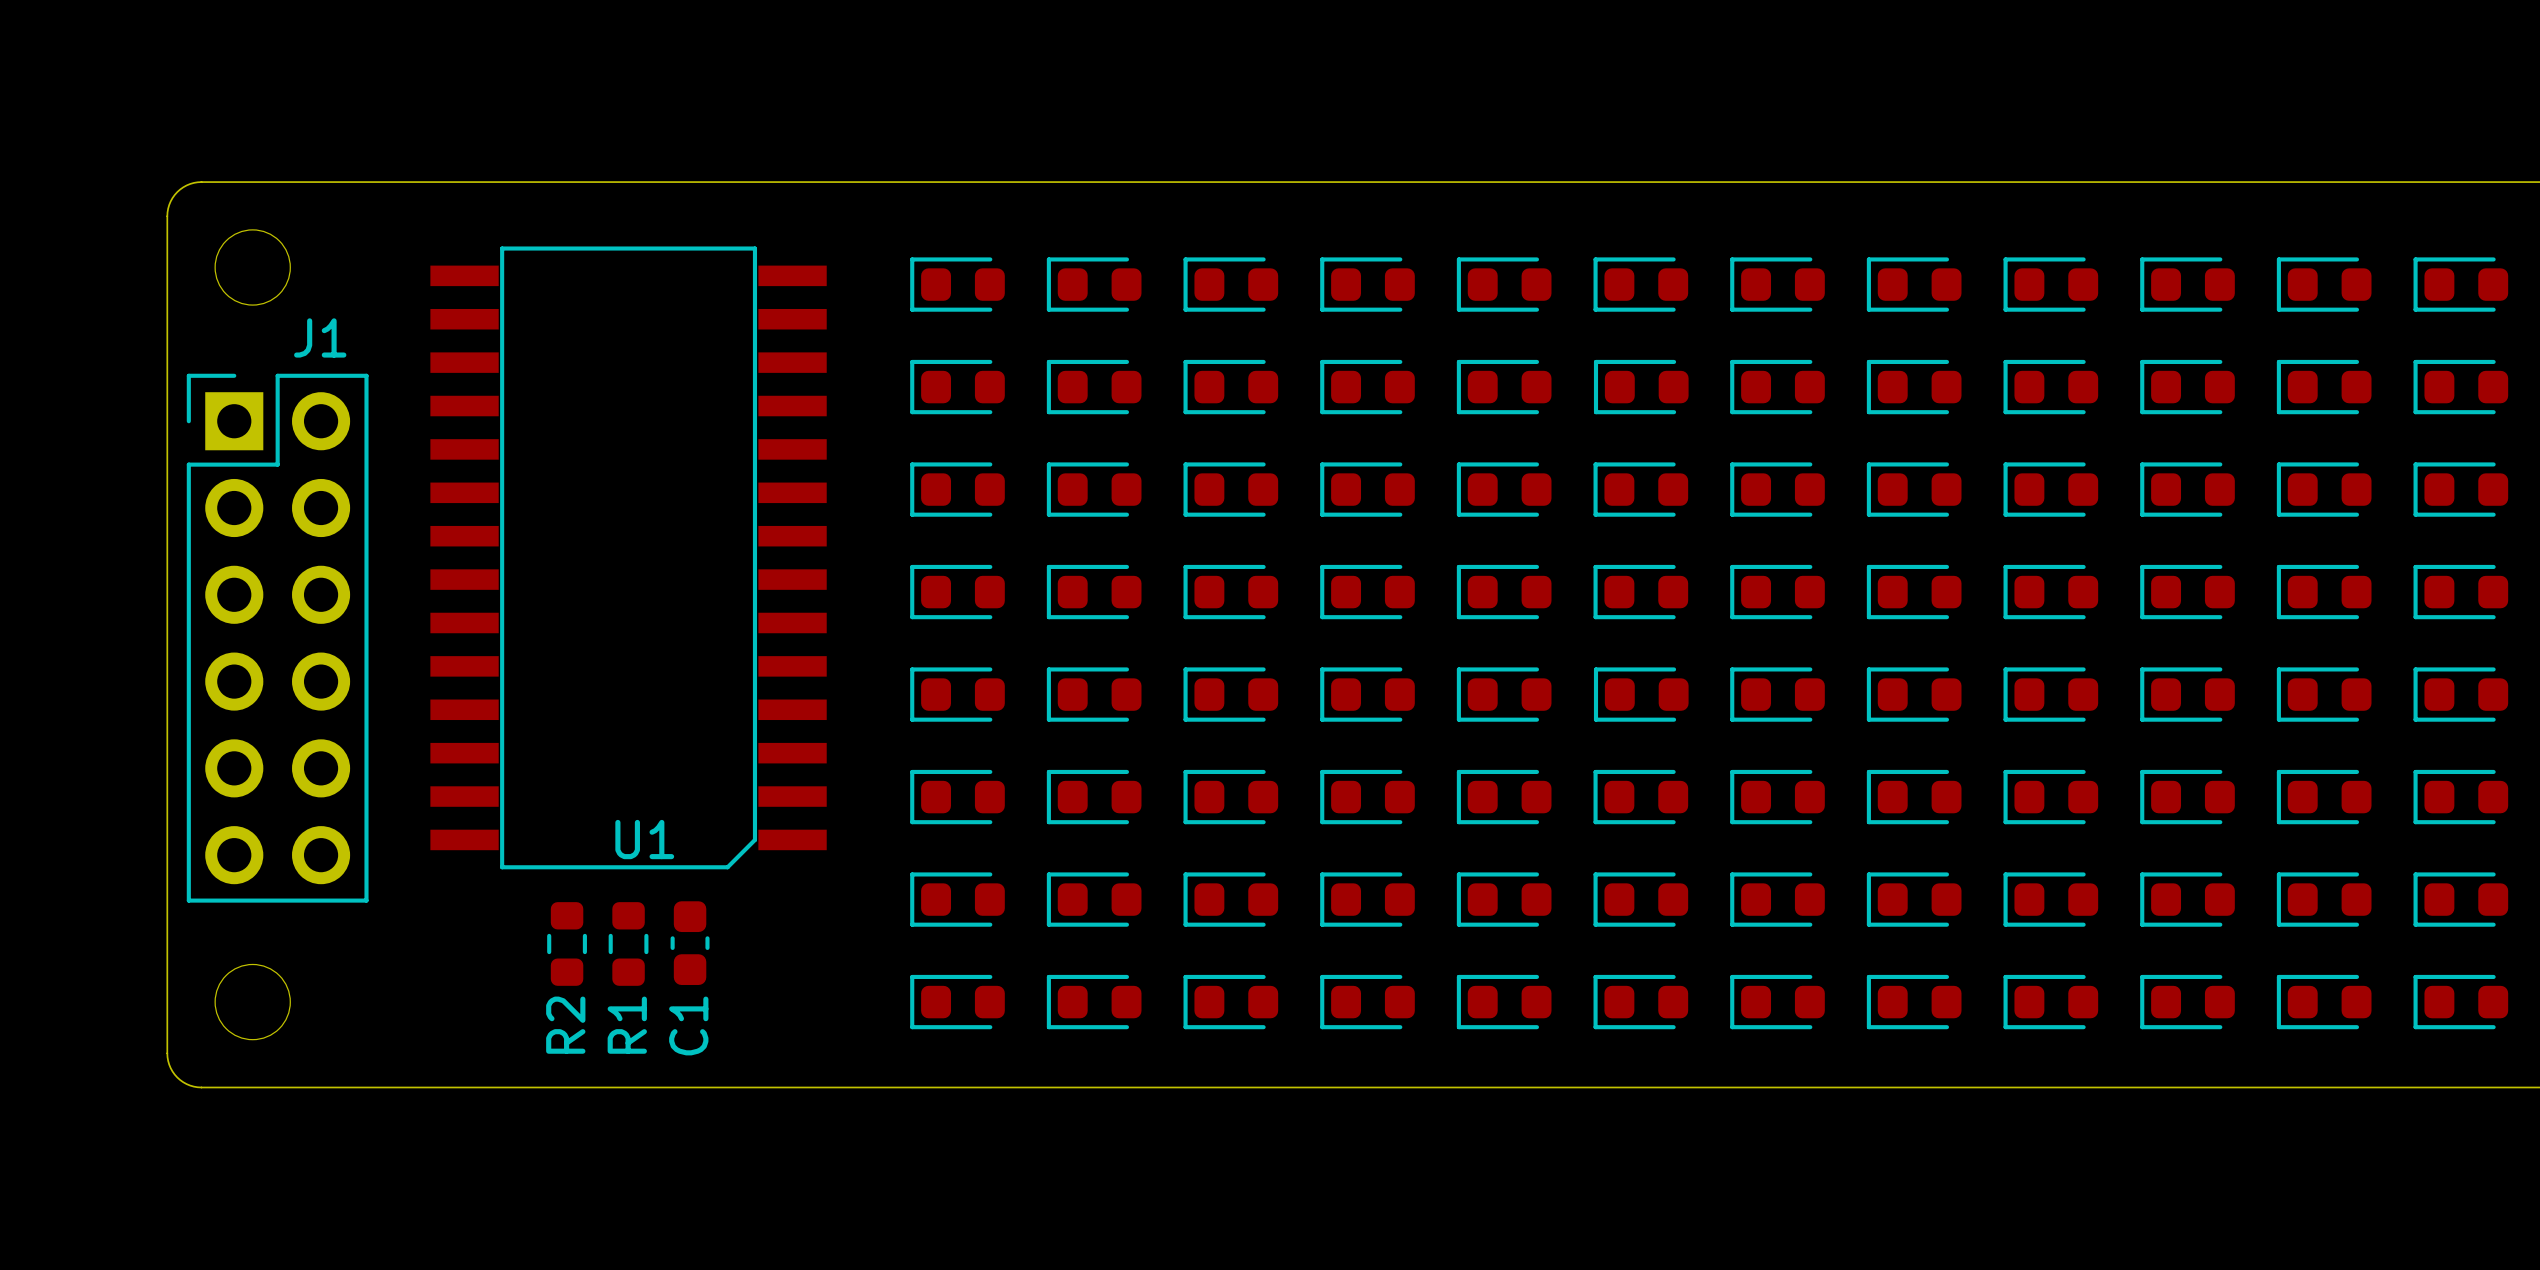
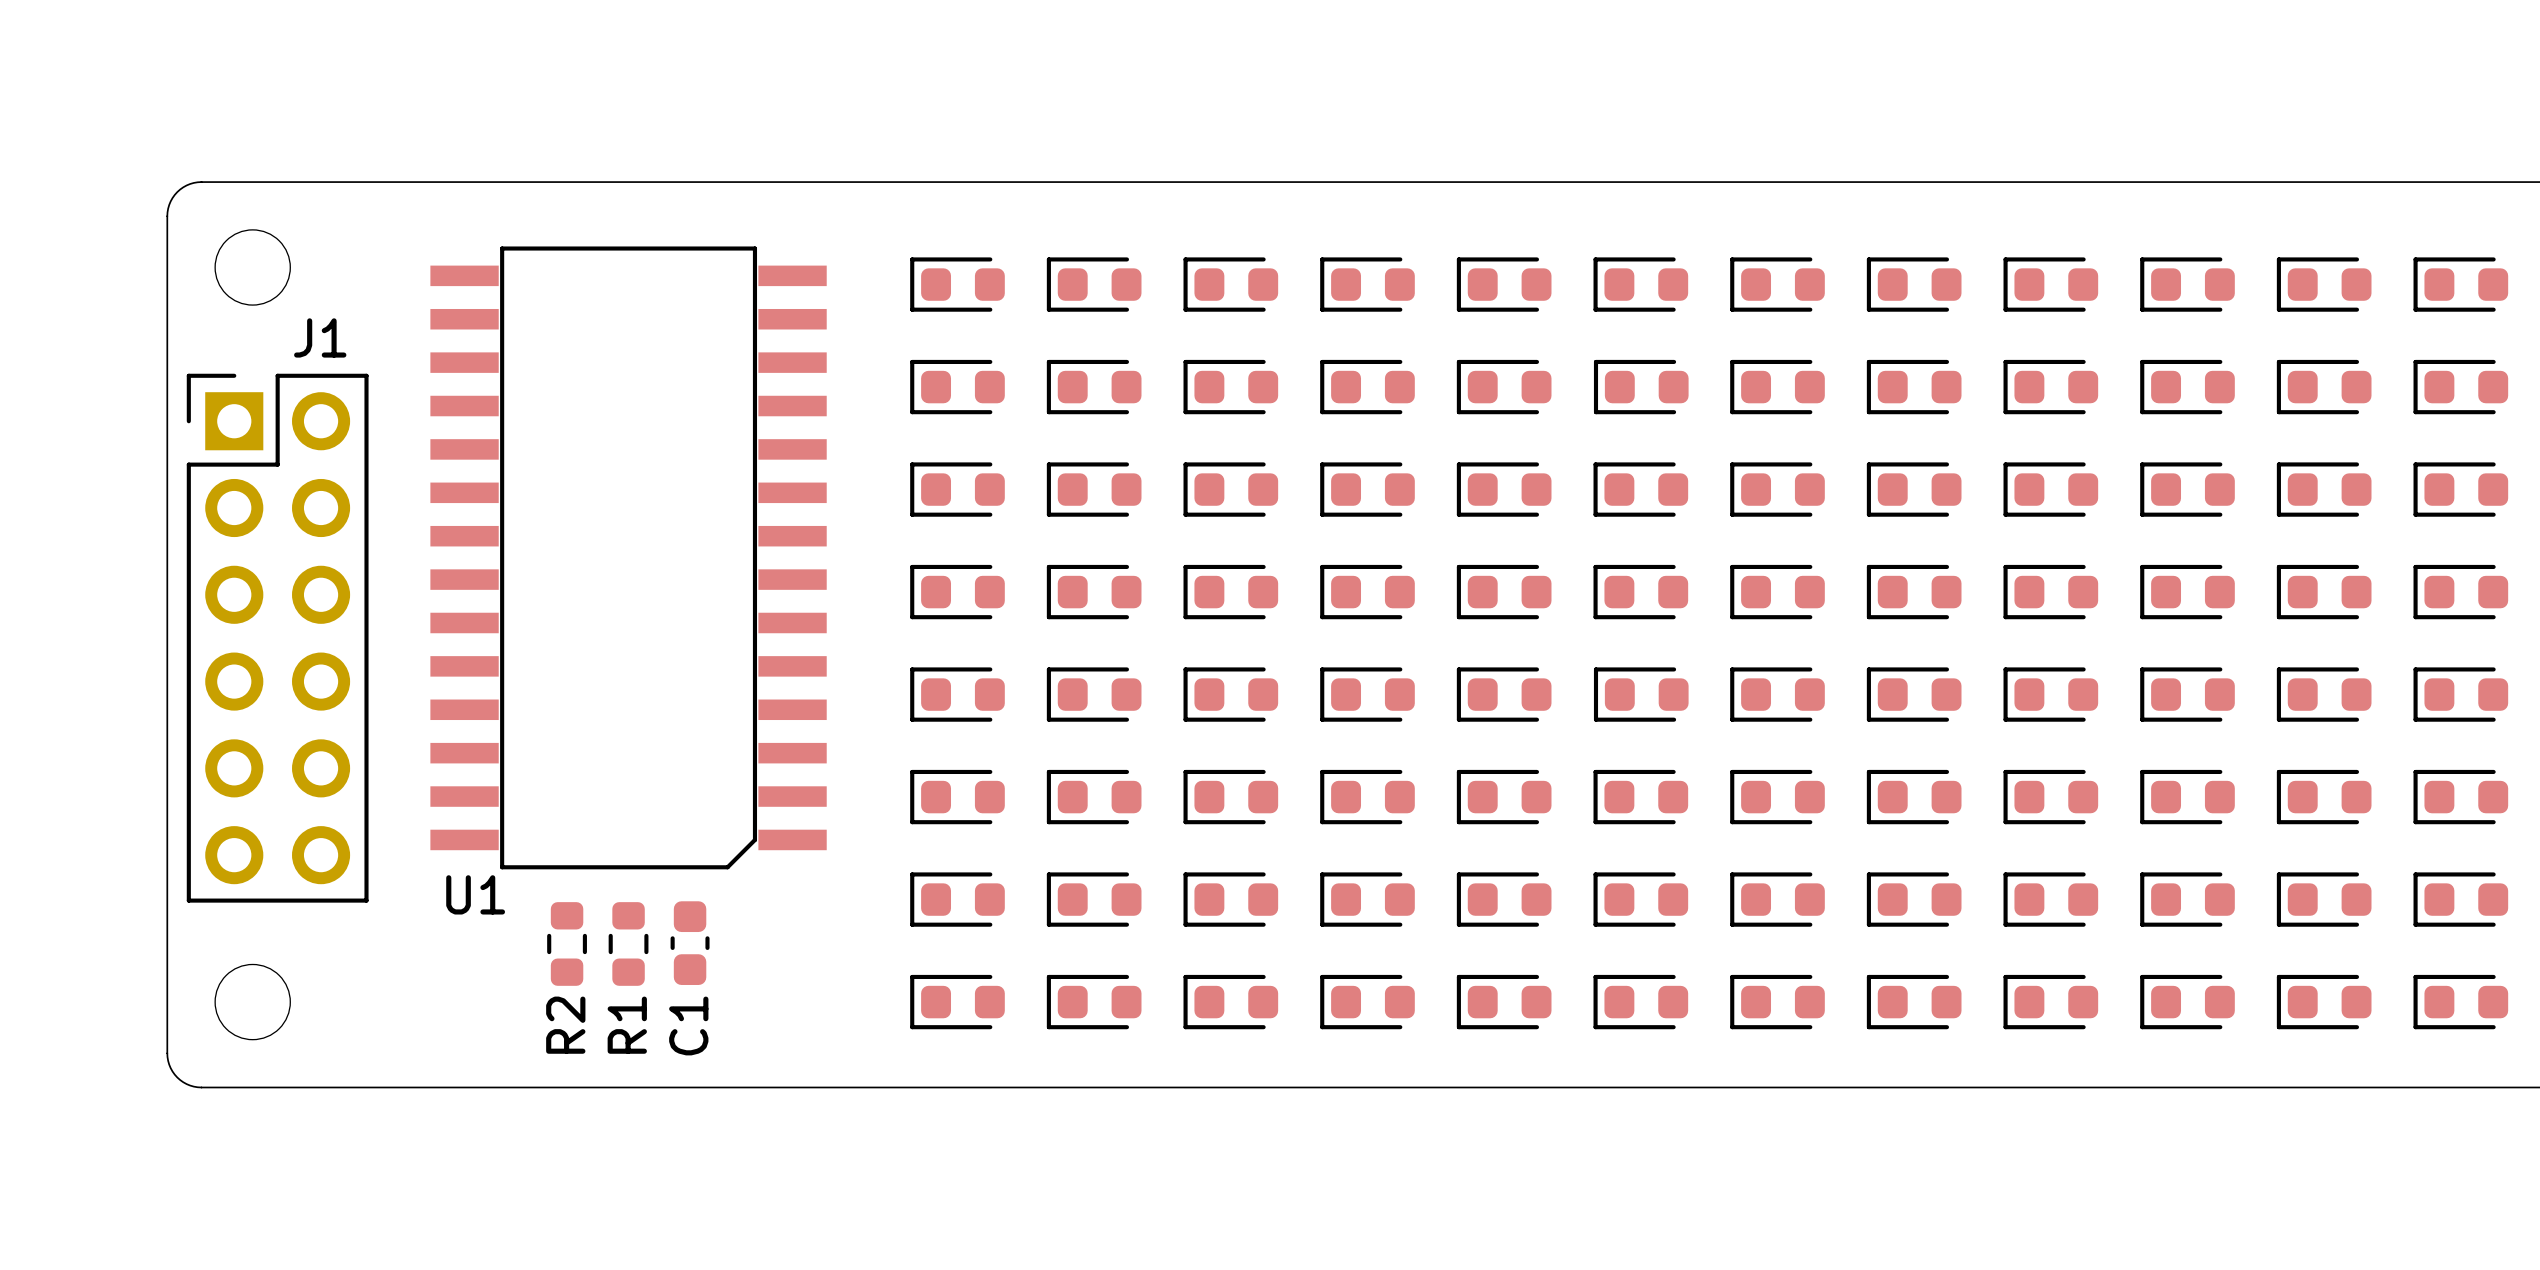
U1 name position: U1 (644, 839) -> U1 (475, 894)

